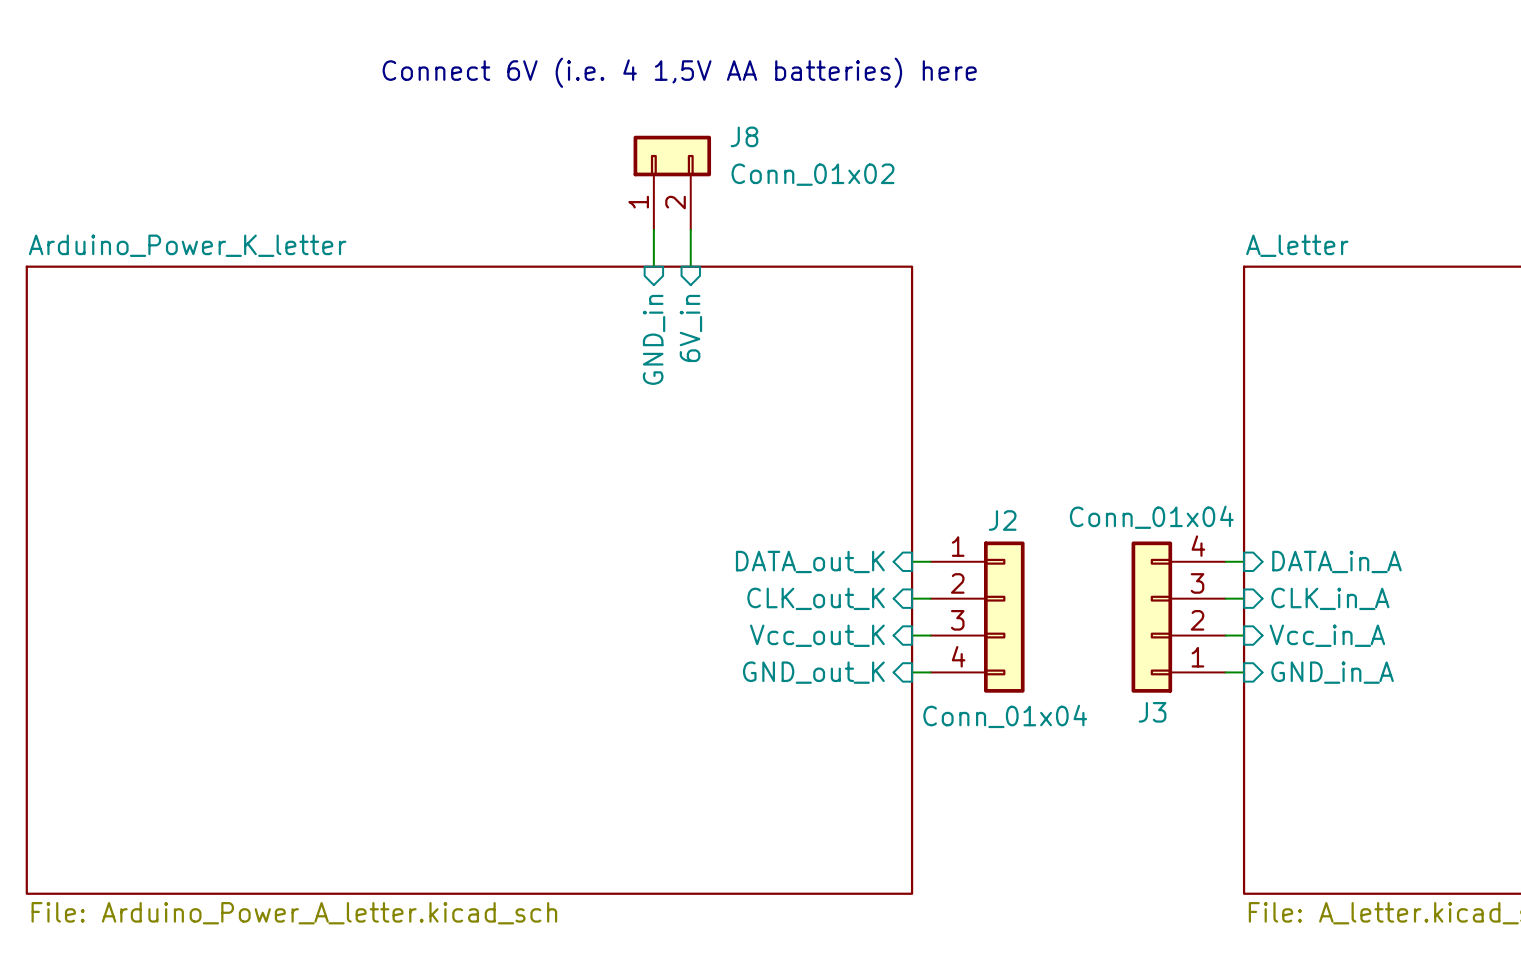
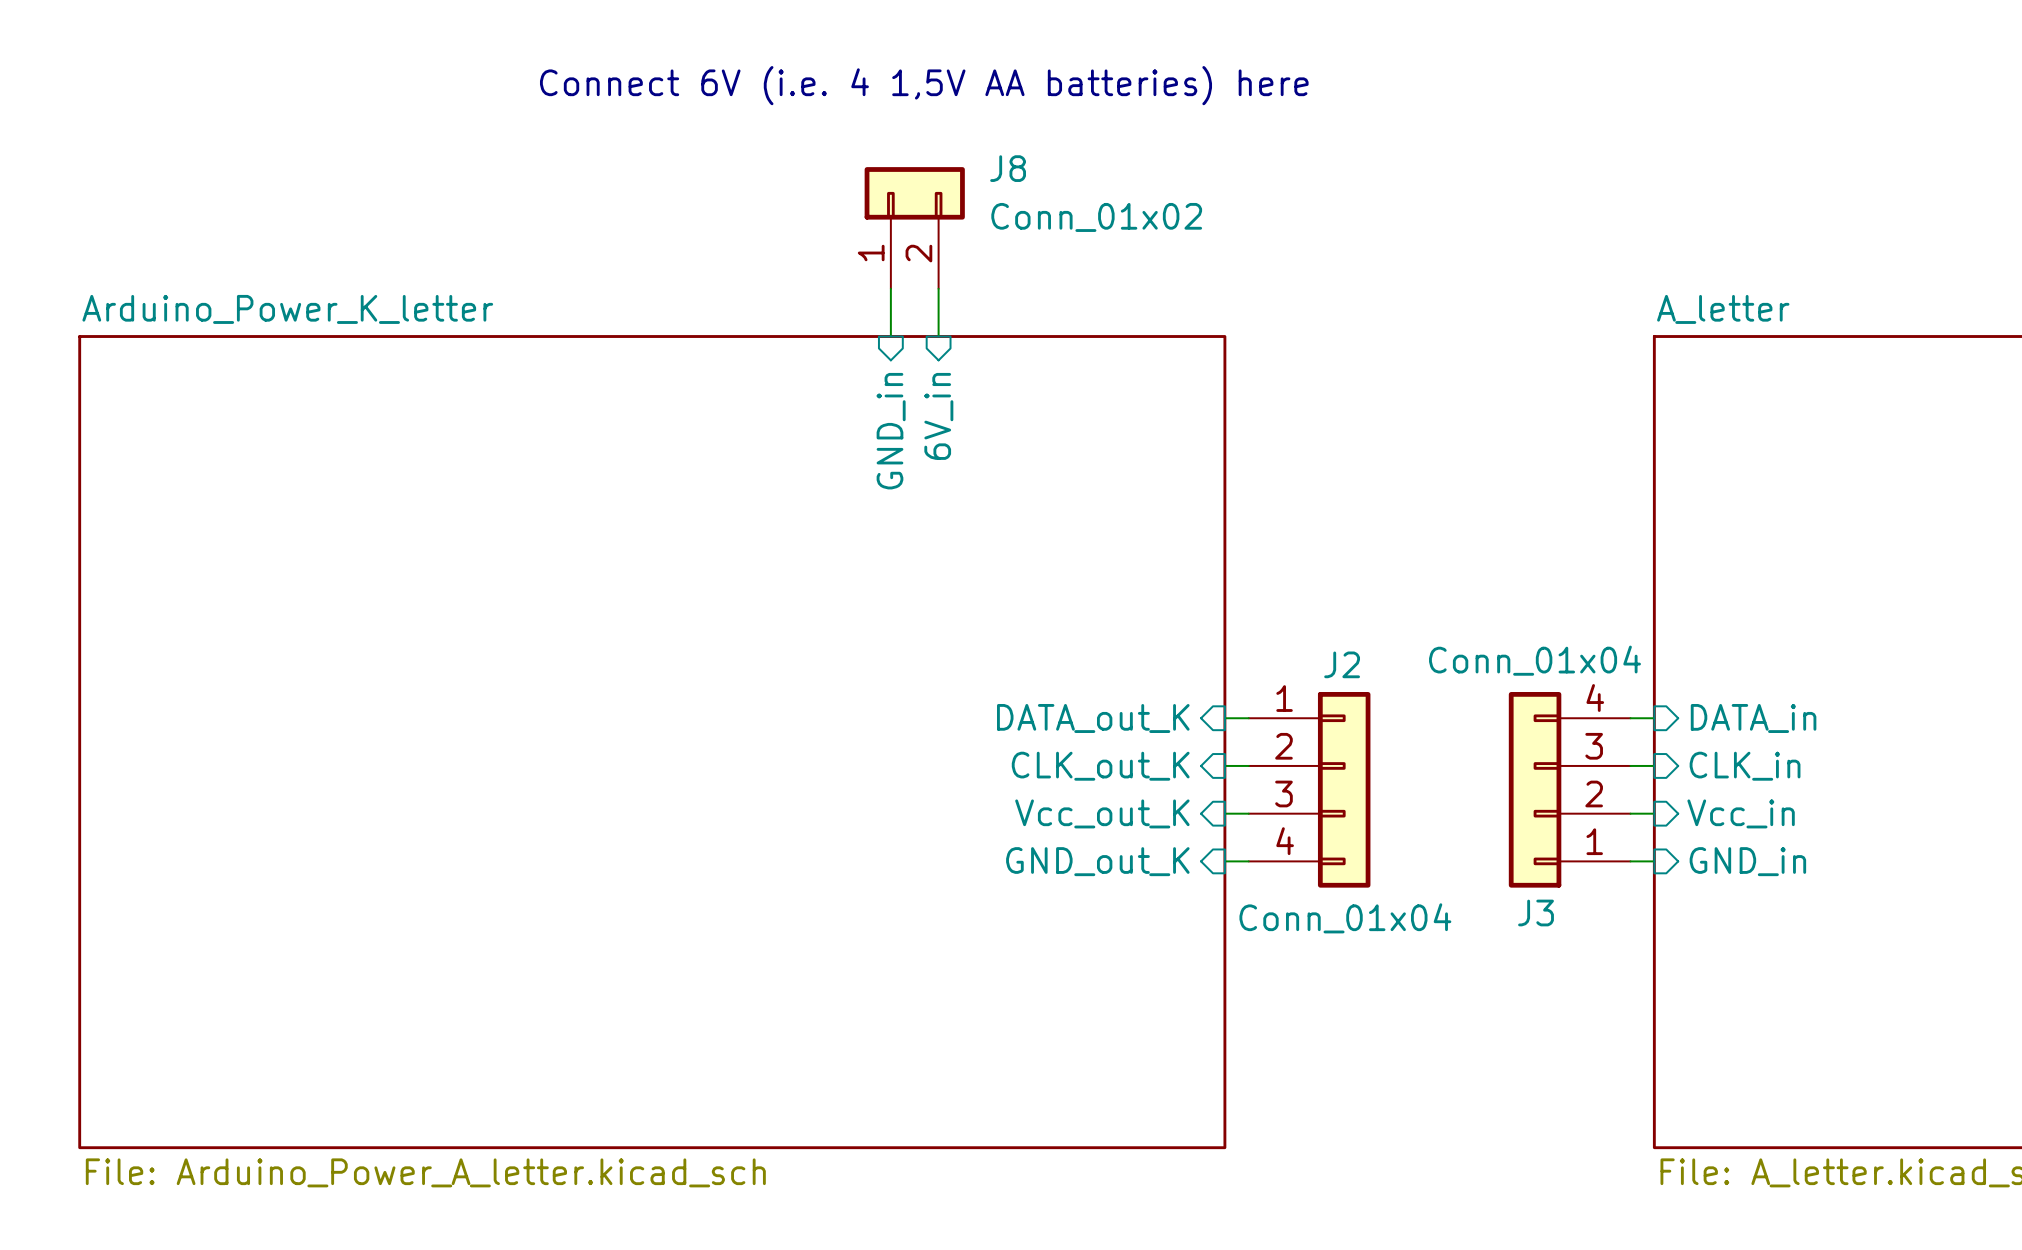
sheet pin: DATA_in_A (1336, 561) -> DATA_in (1753, 718)
sheet pin: CLK_in_A (1330, 598) -> CLK_in (1745, 766)
sheet pin: Vcc_in_A (1327, 635) -> Vcc_in (1741, 813)
sheet pin: GND_in_A (1332, 672) -> GND_in (1747, 861)

